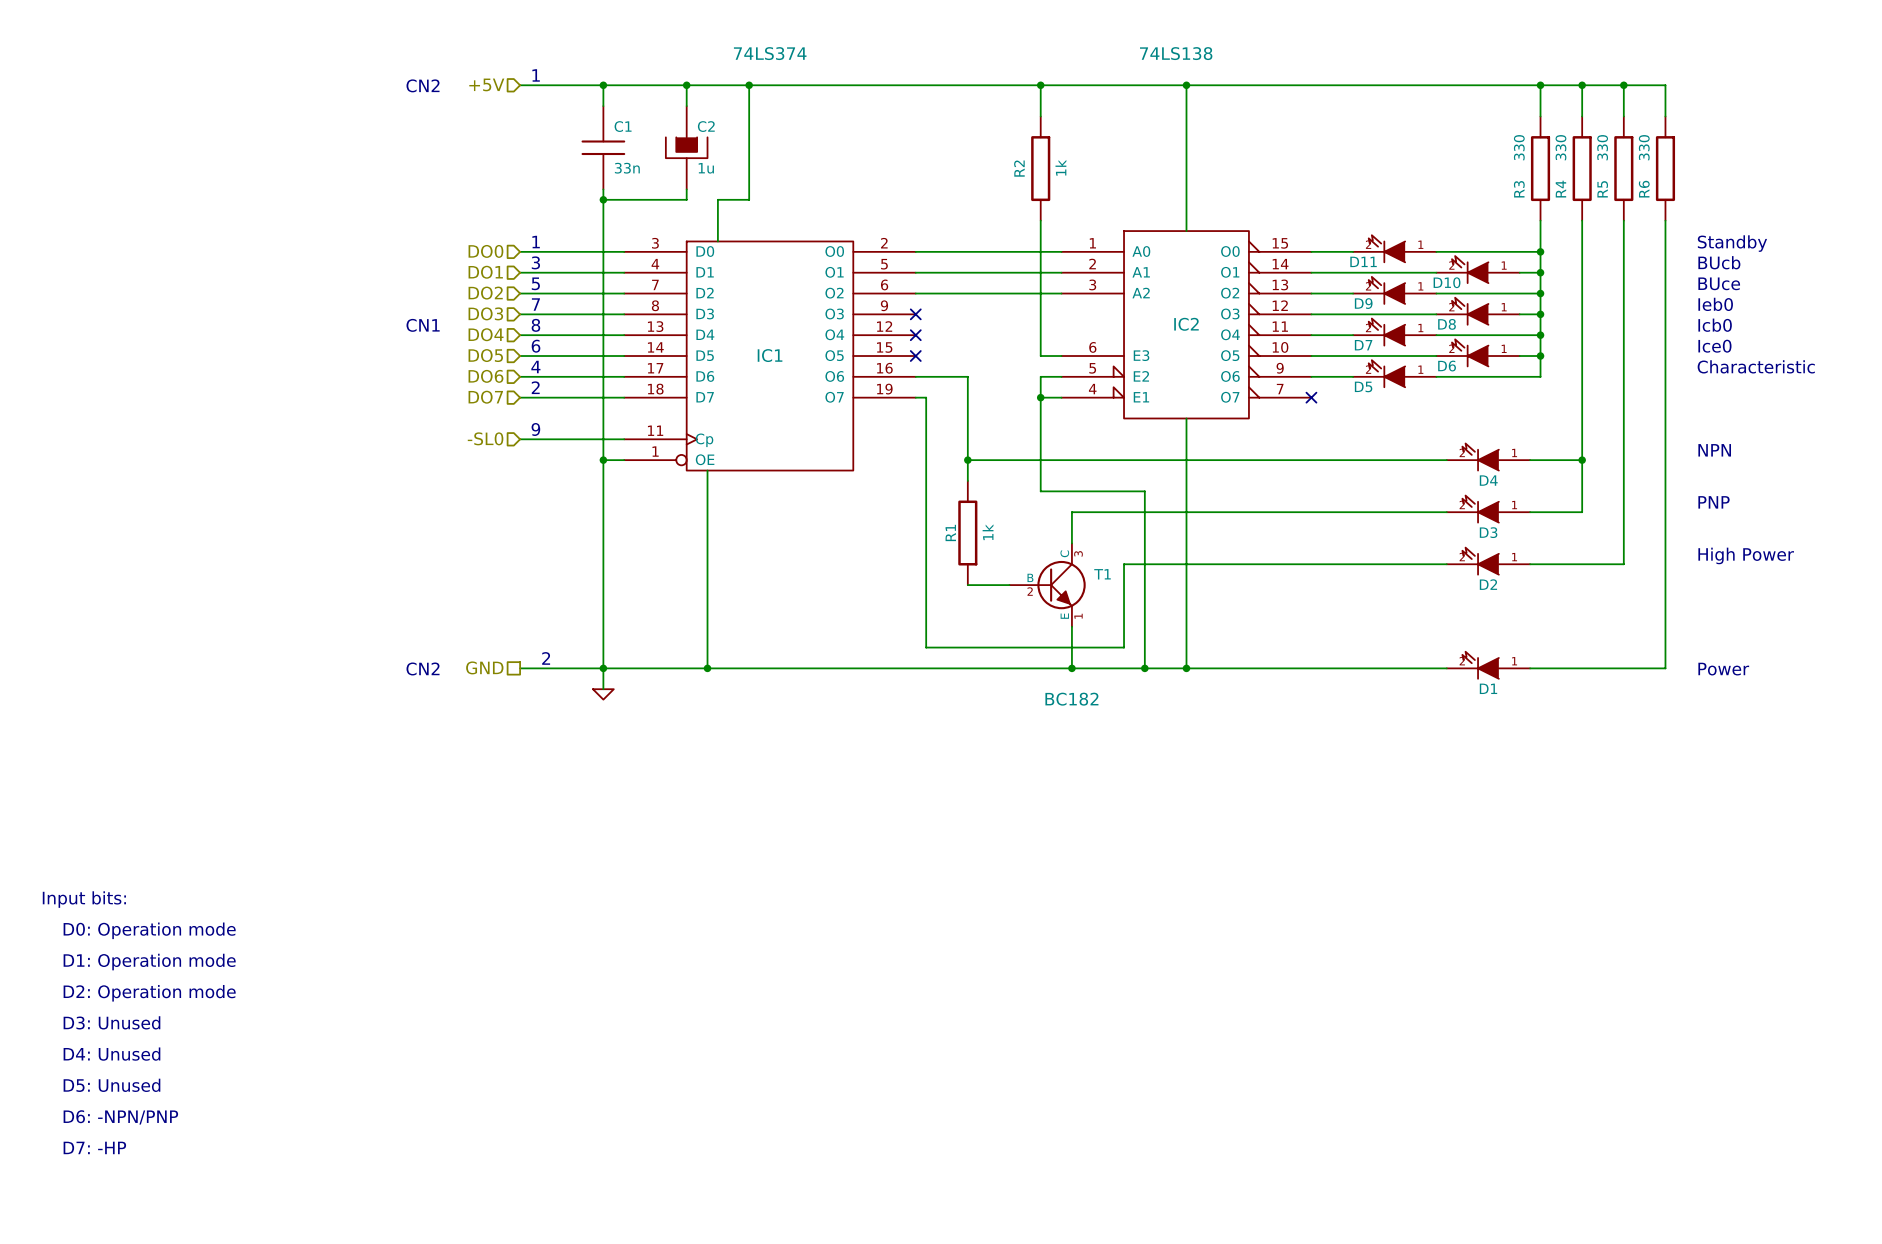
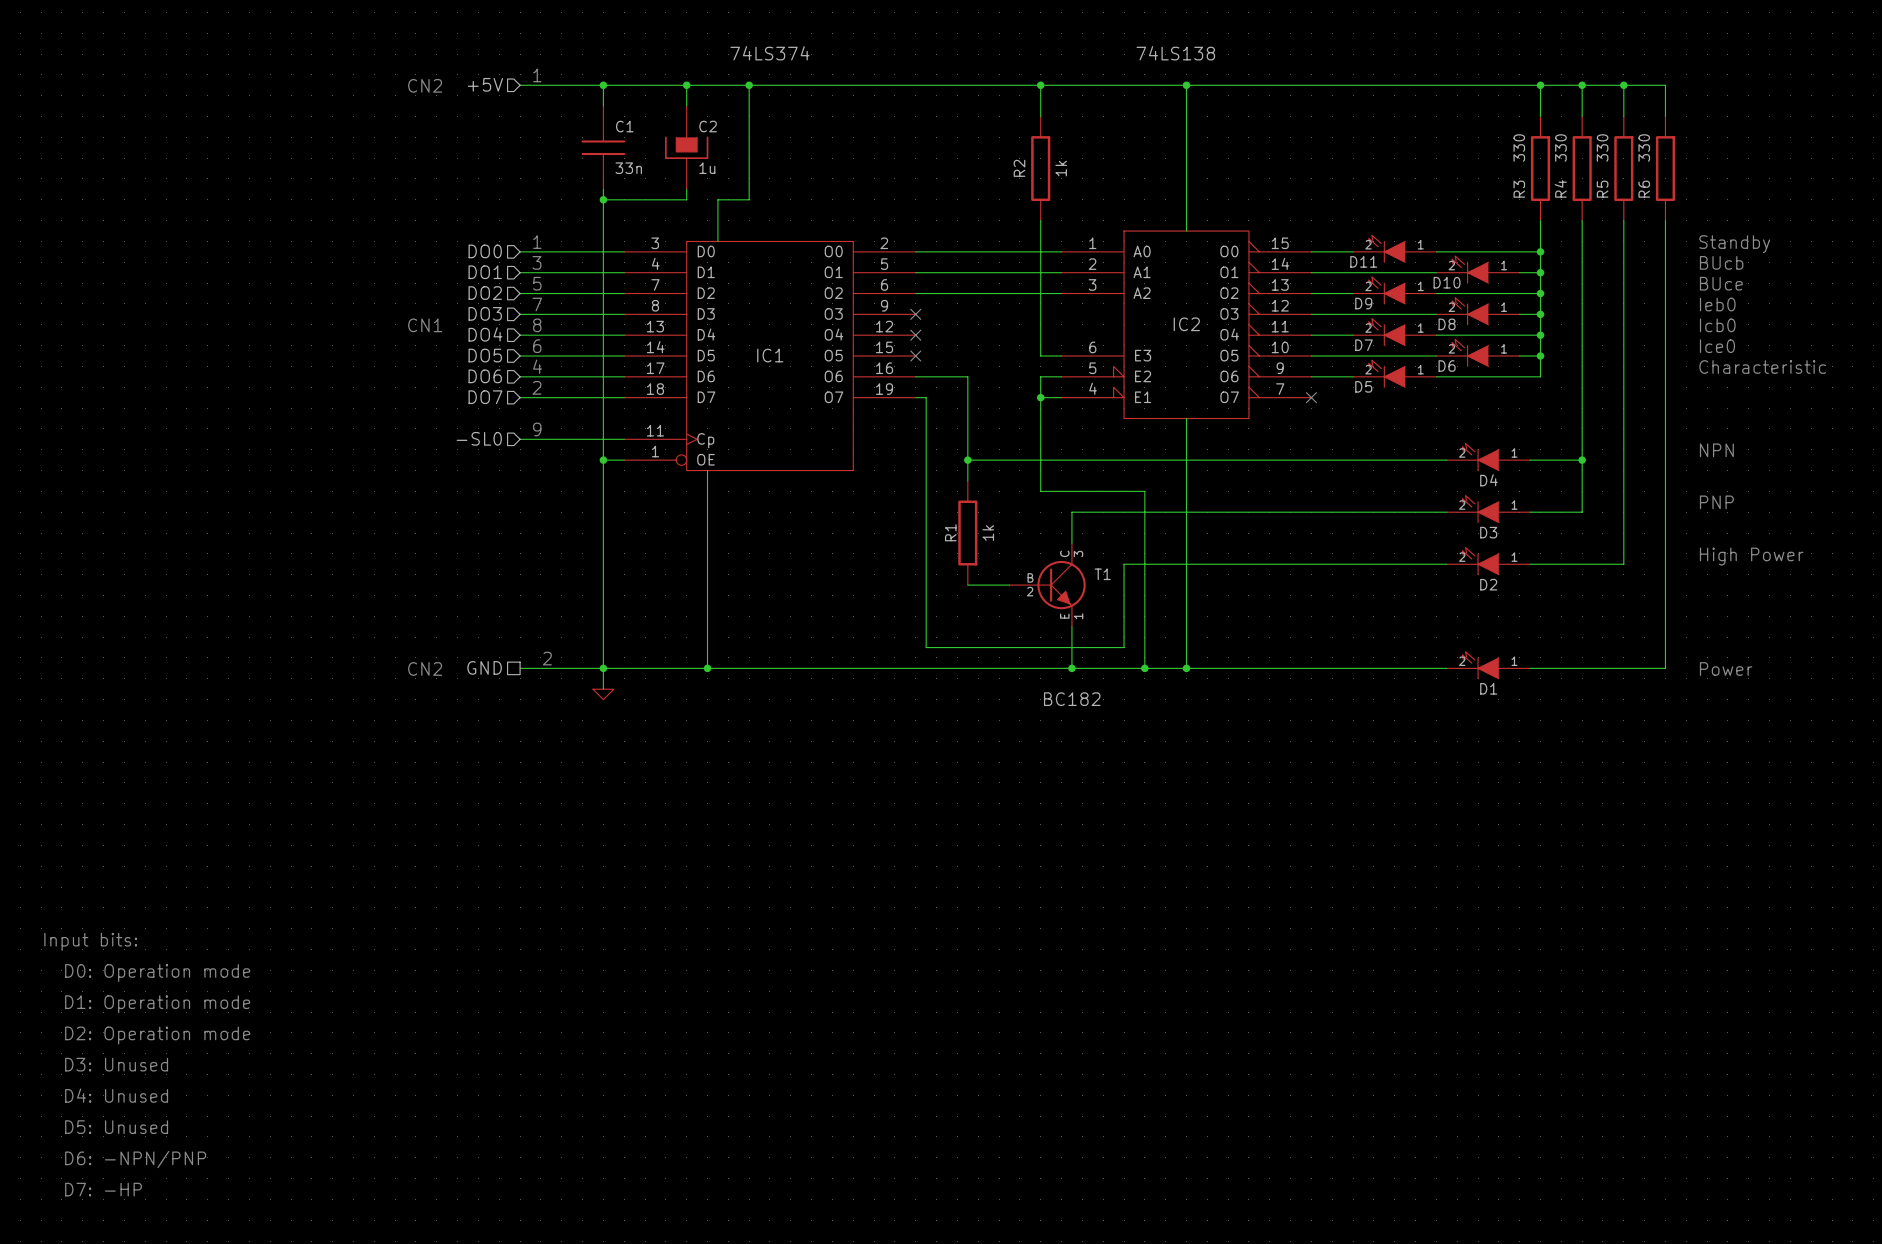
text position: Input bits: (84, 899) -> Input bits: (90, 941)
text position: D0: Operation mode (149, 930) -> D0: Operation mode (157, 973)
text position: D1: Operation mode (149, 962) -> D1: Operation mode (157, 1004)
text position: D2: Operation mode (149, 993) -> D2: Operation mode (157, 1035)
text position: D3: Unused (111, 1022) -> D3: Unused (116, 1064)
text position: D4: Unused (111, 1054) -> D4: Unused (116, 1095)
text position: D5: Unused (111, 1085) -> D5: Unused (116, 1127)
text position: D6: -NPN/PNP (120, 1117) -> D6: -NPN/PNP (135, 1159)
text position: D7: -HP (94, 1147) -> D7: -HP (103, 1189)

